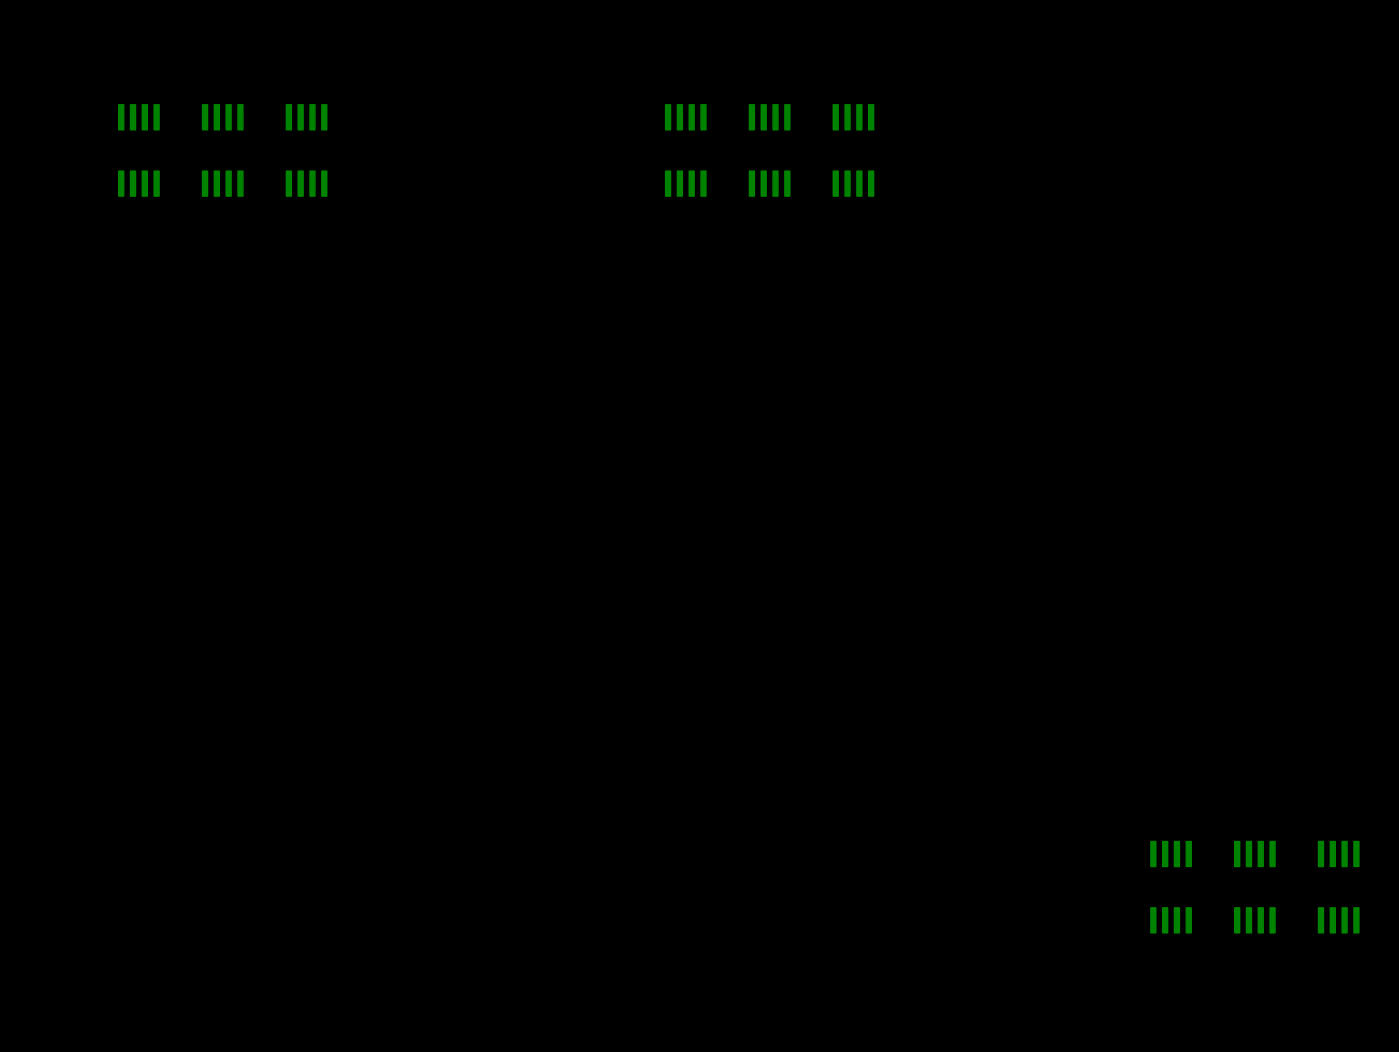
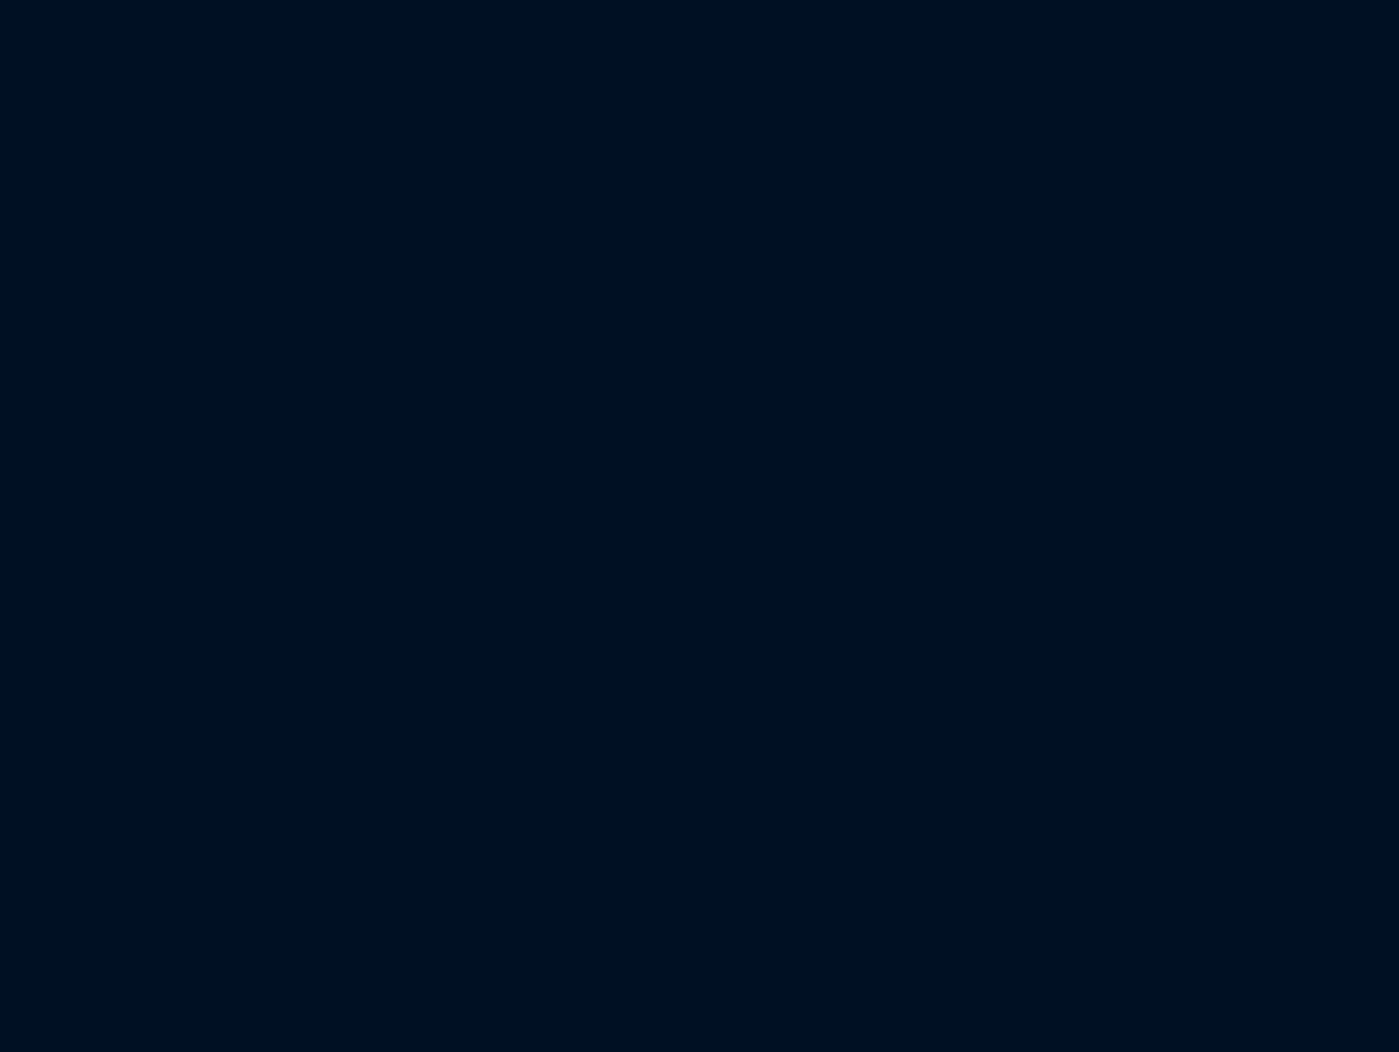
part: (138, 150) -> none
part: (222, 150) -> none
part: (306, 150) -> none
part: (685, 150) -> none
part: (769, 150) -> none
part: (853, 150) -> none
part: (1171, 887) -> none
part: (1254, 887) -> none
part: (1338, 887) -> none

